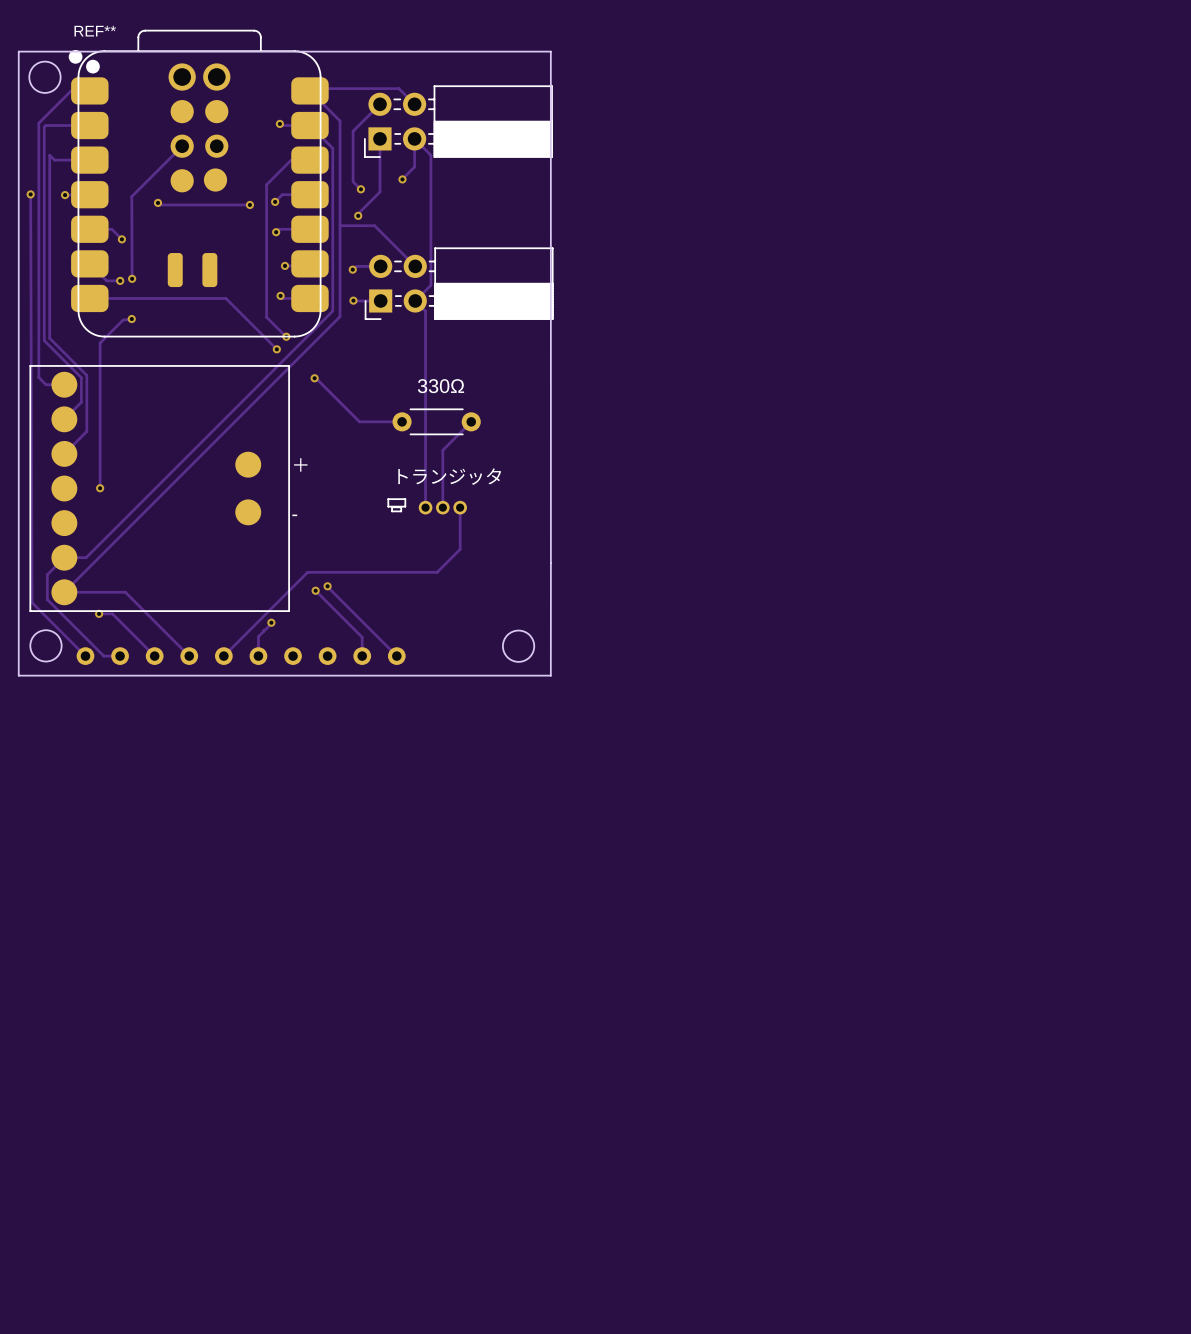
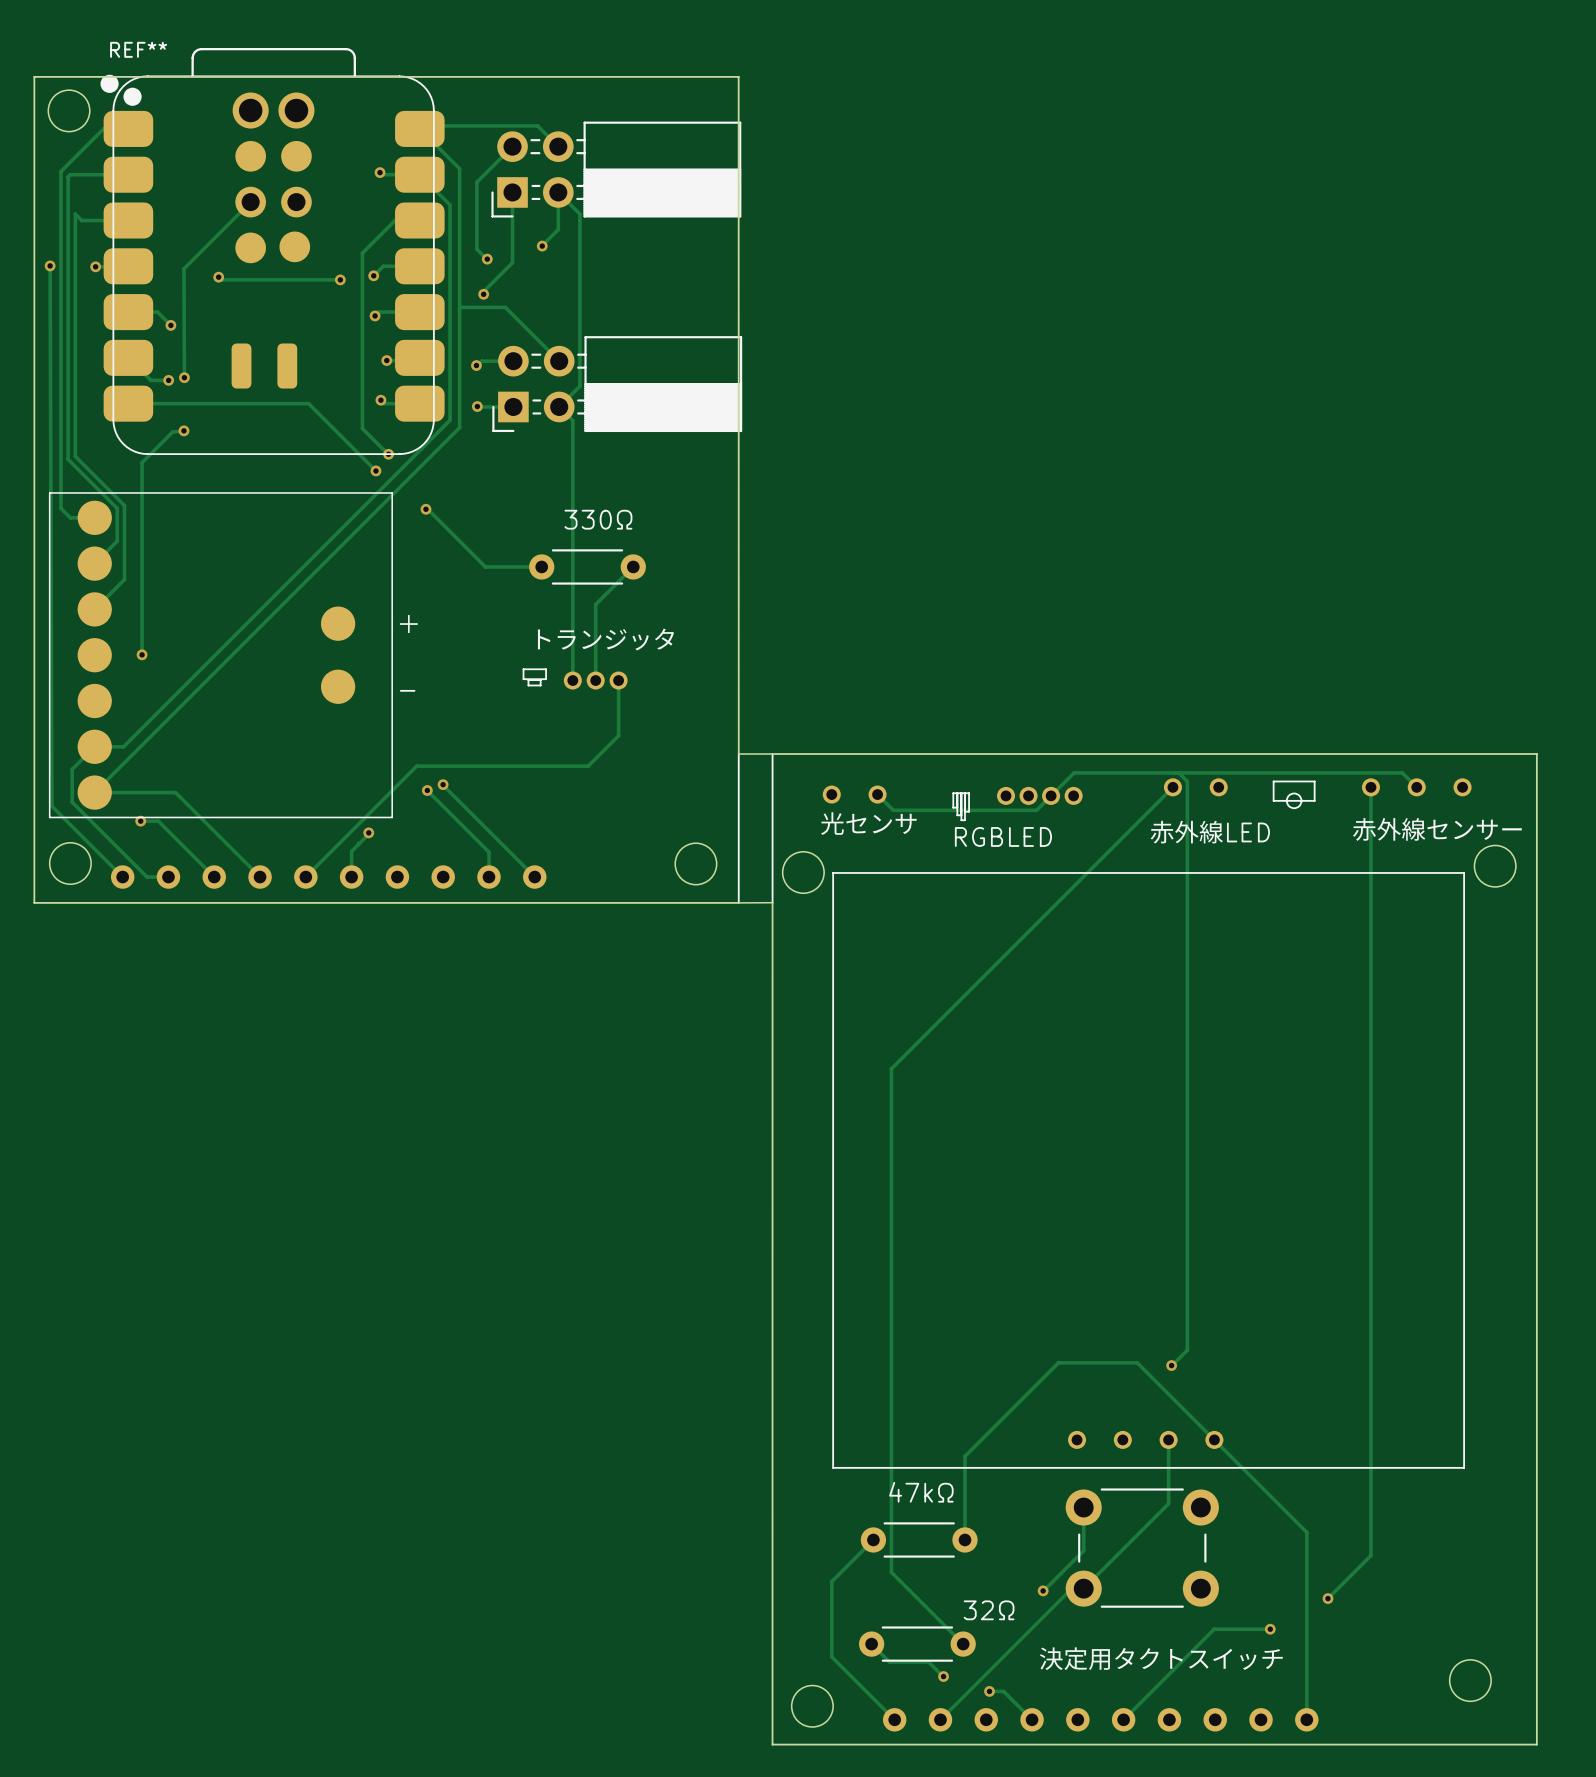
line: none -> (738, 753) (738, 902)
board edge: (550, 563) (550, 675) -> (738, 753) (1536, 753) (1536, 1744) (772, 1744) (772, 902) (738, 902)
line: none -> (772, 753) (772, 903)
track: none -> (1178, 772) (1187, 781) (1187, 1350) (1172, 1365)
line: none -> (1273, 781) (1314, 781) (1314, 800) (1273, 800) (1273, 781)
track: none -> (1172, 787) (891, 1068) (891, 1572) (963, 1644)
part: none -> (1172, 787)
part: none -> (1218, 787)
track: none -> (1370, 787) (1370, 1555) (1327, 1599)
part: none -> (1370, 787)
track: none -> (1416, 787) (1402, 772) (1074, 772) (1036, 810) (893, 810) (877, 794)
part: none -> (1416, 787)
part: none -> (1462, 787)
line: none -> (957, 793) (957, 815) (961, 815)
line: none -> (961, 793) (961, 820) (965, 820) (965, 793)
drawing: none -> [1285, 792, 1303, 810]
part: none -> (831, 794)
part: none -> (877, 794)
part: none -> (1006, 795)
part: none -> (1028, 795)
part: none -> (1051, 795)
part: none -> (1073, 795)
line: none -> (957, 807) (953, 807) (953, 793) (969, 793) (969, 811) (965, 811)
text: none -> 光センサ (868, 823)
text: none -> 赤外線センサー (1437, 829)
text: none -> 赤外線LED (1209, 832)
text: none -> RGBLED (1003, 836)
round board edge: none -> [1473, 845, 1517, 888]
round board edge: none -> [782, 851, 825, 894]
line: none -> (833, 872) (1464, 872) (1464, 1467) (833, 1467) (833, 872)
via: none -> (1171, 1365)
part: none -> (1077, 1439)
part: none -> (1122, 1439)
track: none -> (1168, 1439) (1168, 1503) (1083, 1588) (1071, 1588) (940, 1719)
part: none -> (1168, 1439)
part: none -> (1214, 1439)
text: none -> 47kΩ (921, 1492)
track: none -> (1083, 1507) (1083, 1550) (1043, 1591)
track: none -> (873, 1539) (831, 1581) (831, 1656) (894, 1719)
part: none -> (919, 1539)
track: none -> (965, 1539) (965, 1456) (1058, 1362) (1137, 1362) (1306, 1532) (1306, 1719)
part: none -> (1142, 1548)
via: none -> (1043, 1590)
via: none -> (1327, 1598)
text: none -> 32Ω (989, 1610)
track: none -> (1270, 1629) (1214, 1629) (1123, 1719)
via: none -> (1270, 1629)
track: none -> (871, 1644) (889, 1662) (928, 1662) (943, 1676)
part: none -> (917, 1644)
text: none -> 決定用タクトスイッチ (1161, 1658)
round board edge: none -> [1449, 1659, 1492, 1702]
via: none -> (943, 1676)
round board edge: none -> [791, 1685, 834, 1728]
track: none -> (989, 1691) (1003, 1691) (1032, 1719)
via: none -> (989, 1691)
part: none -> (894, 1719)
part: none -> (940, 1719)
part: none -> (986, 1719)
part: none -> (1032, 1719)
part: none -> (1077, 1719)
part: none -> (1123, 1719)
part: none -> (1169, 1719)
part: none -> (1215, 1719)
part: none -> (1261, 1719)
part: none -> (1306, 1719)

